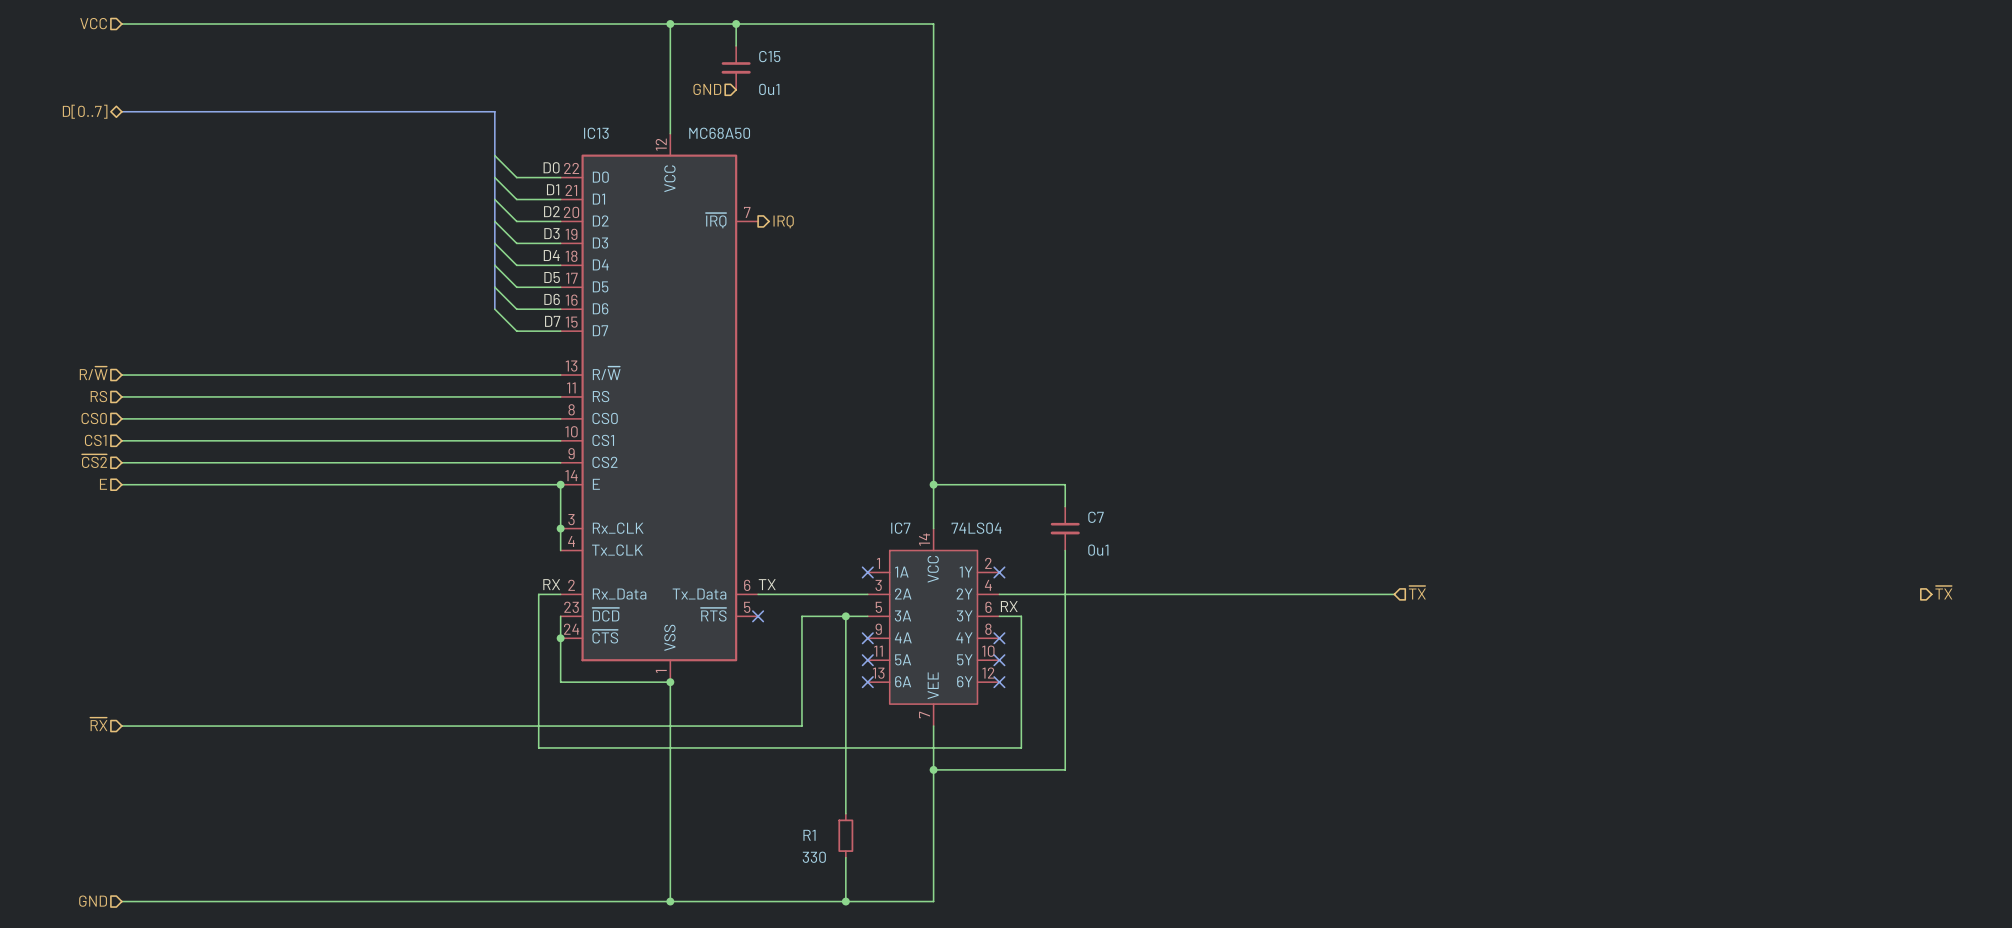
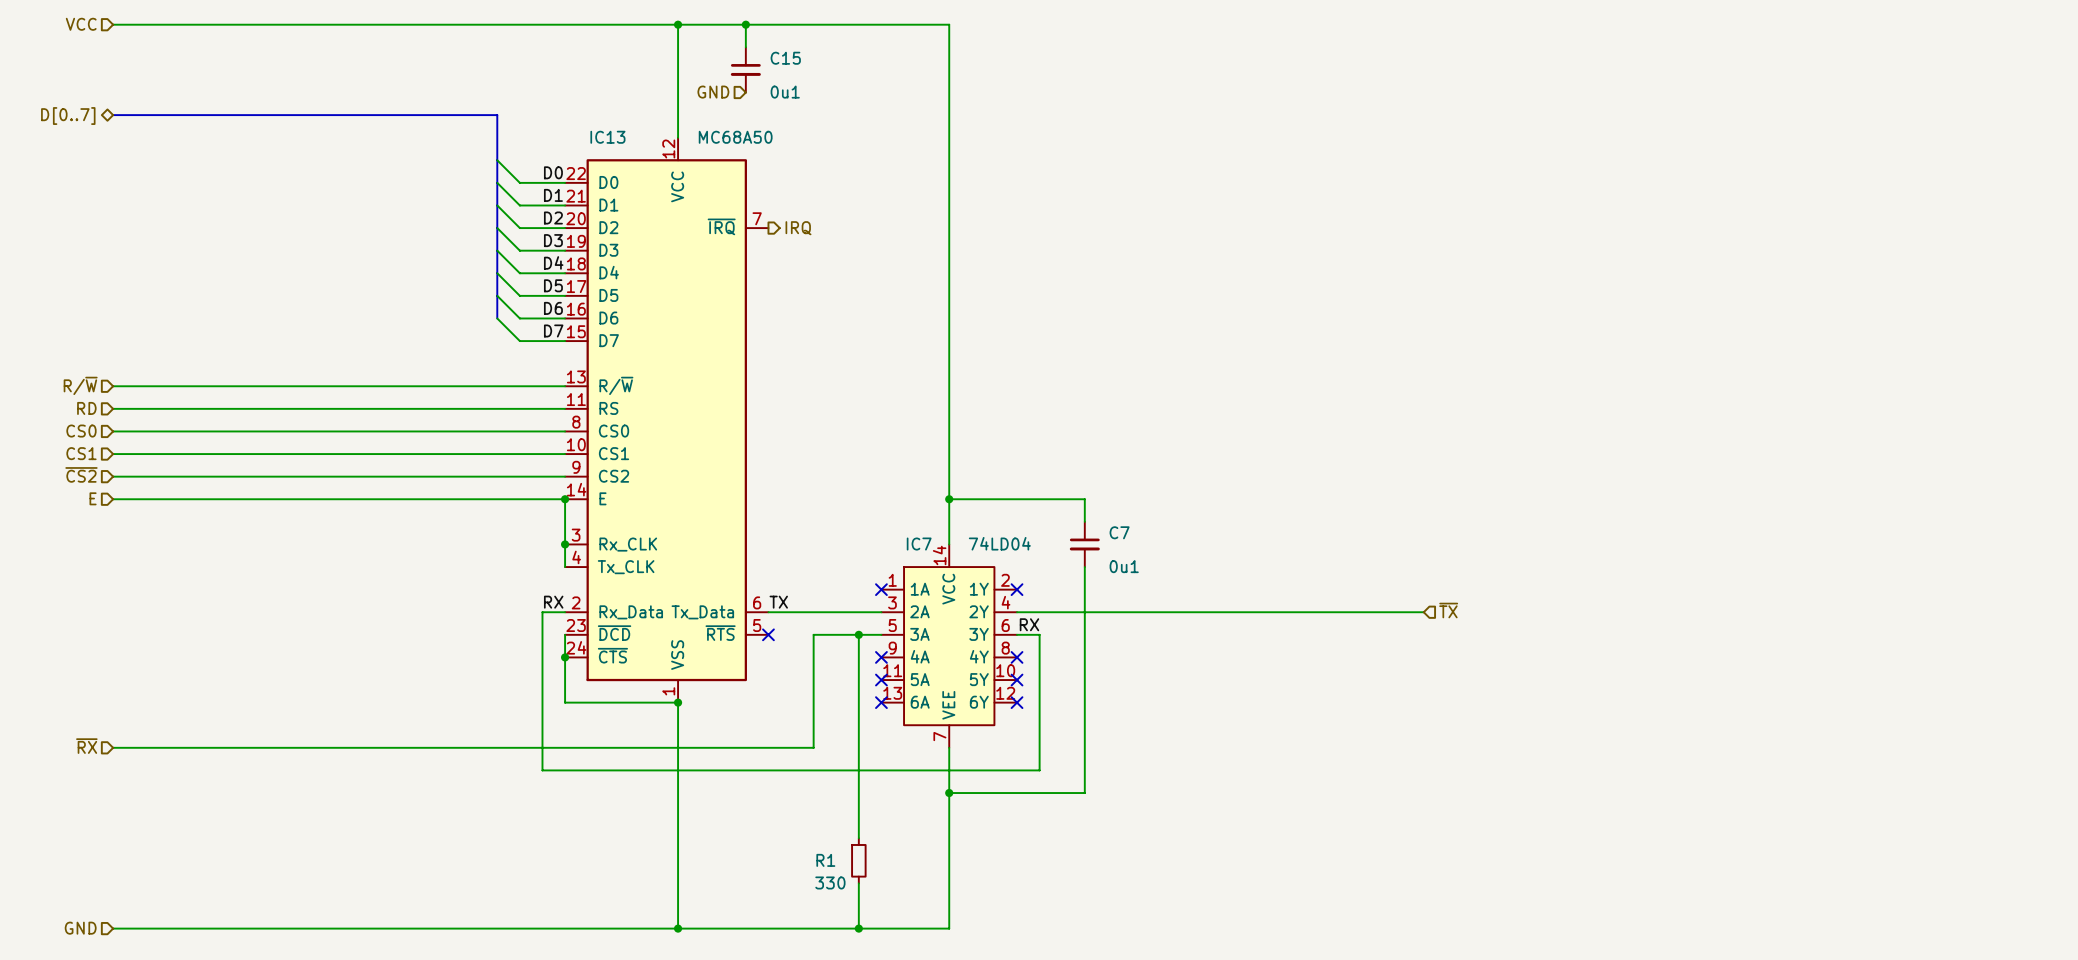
hierarchical label: RS (98, 396) -> RD (86, 408)
IC7 value: 74LS04 (976, 528) -> 74LD04 (999, 543)
hierarchical label: ~{TX} (1943, 592) -> none

